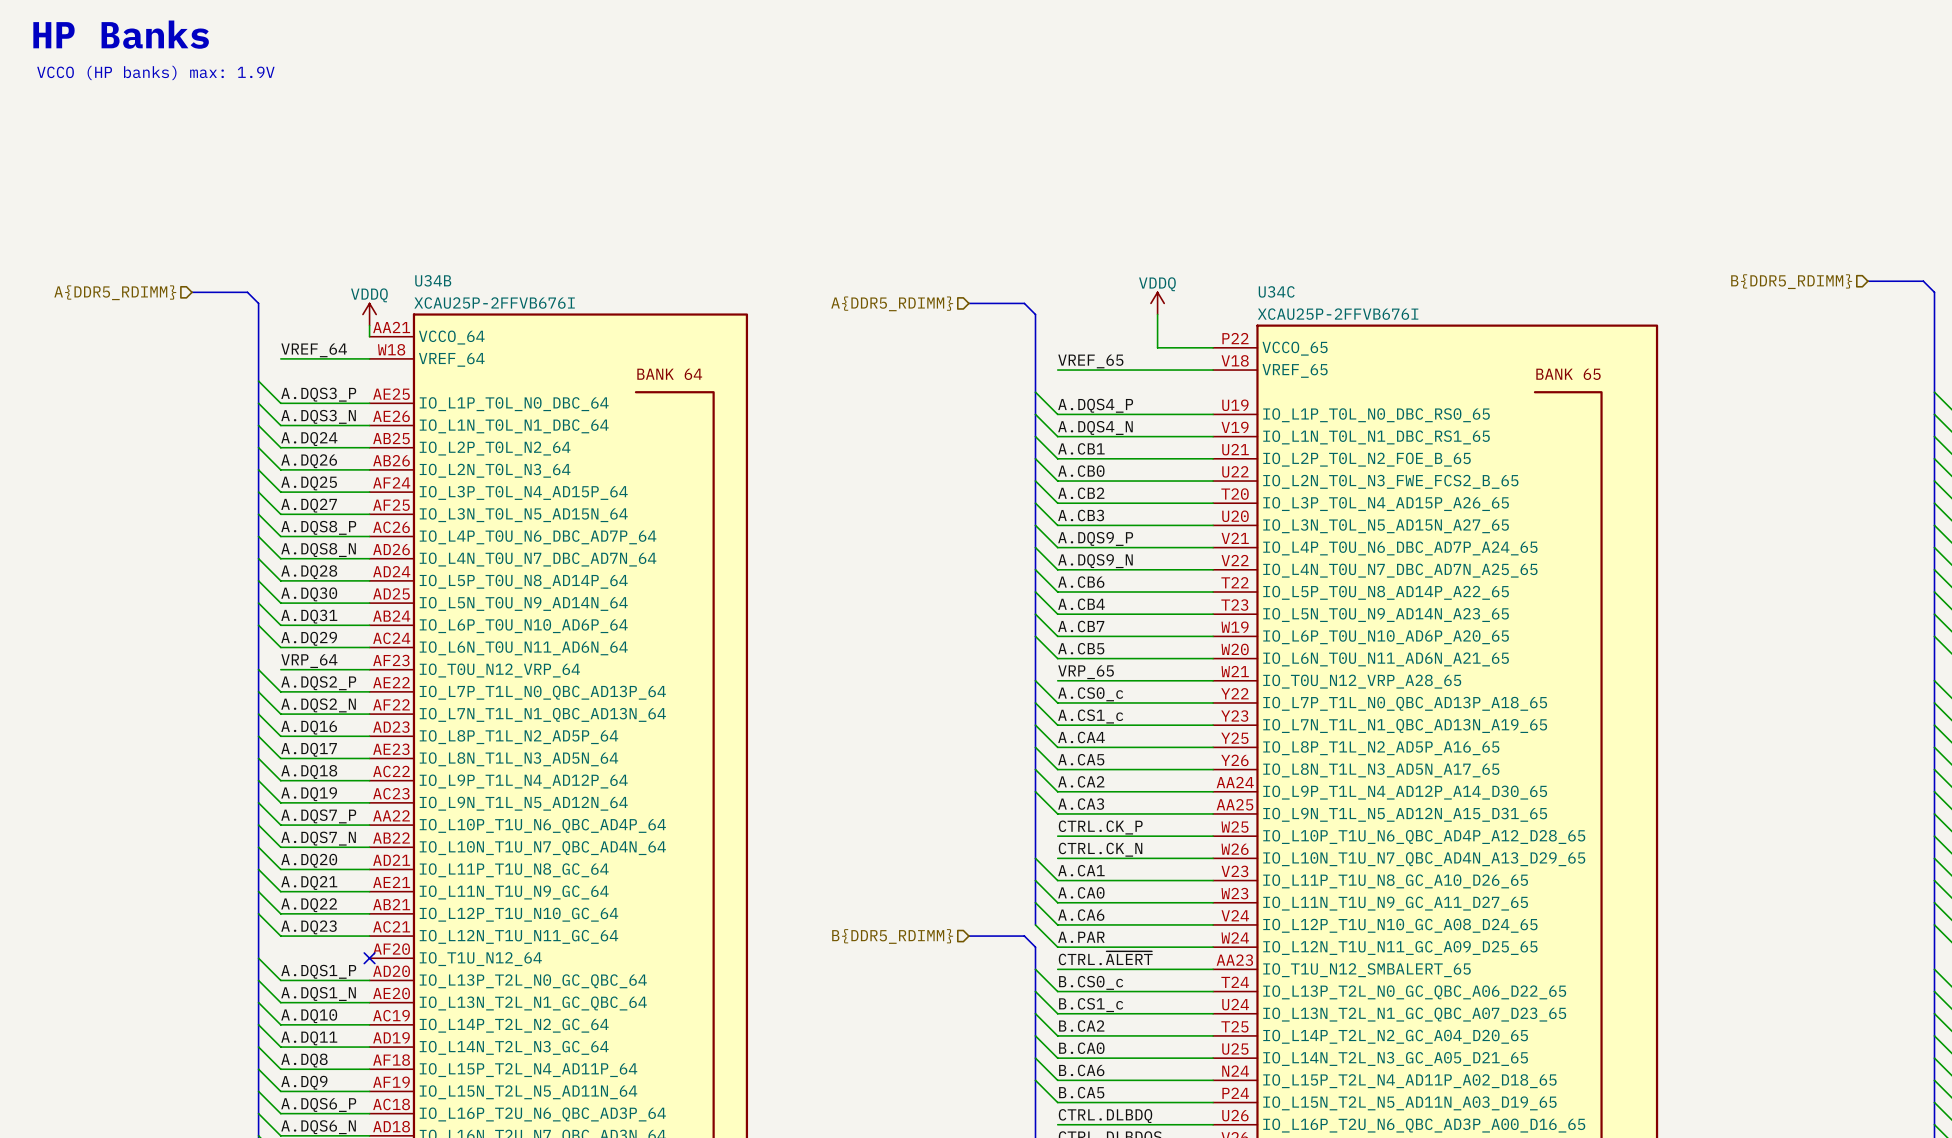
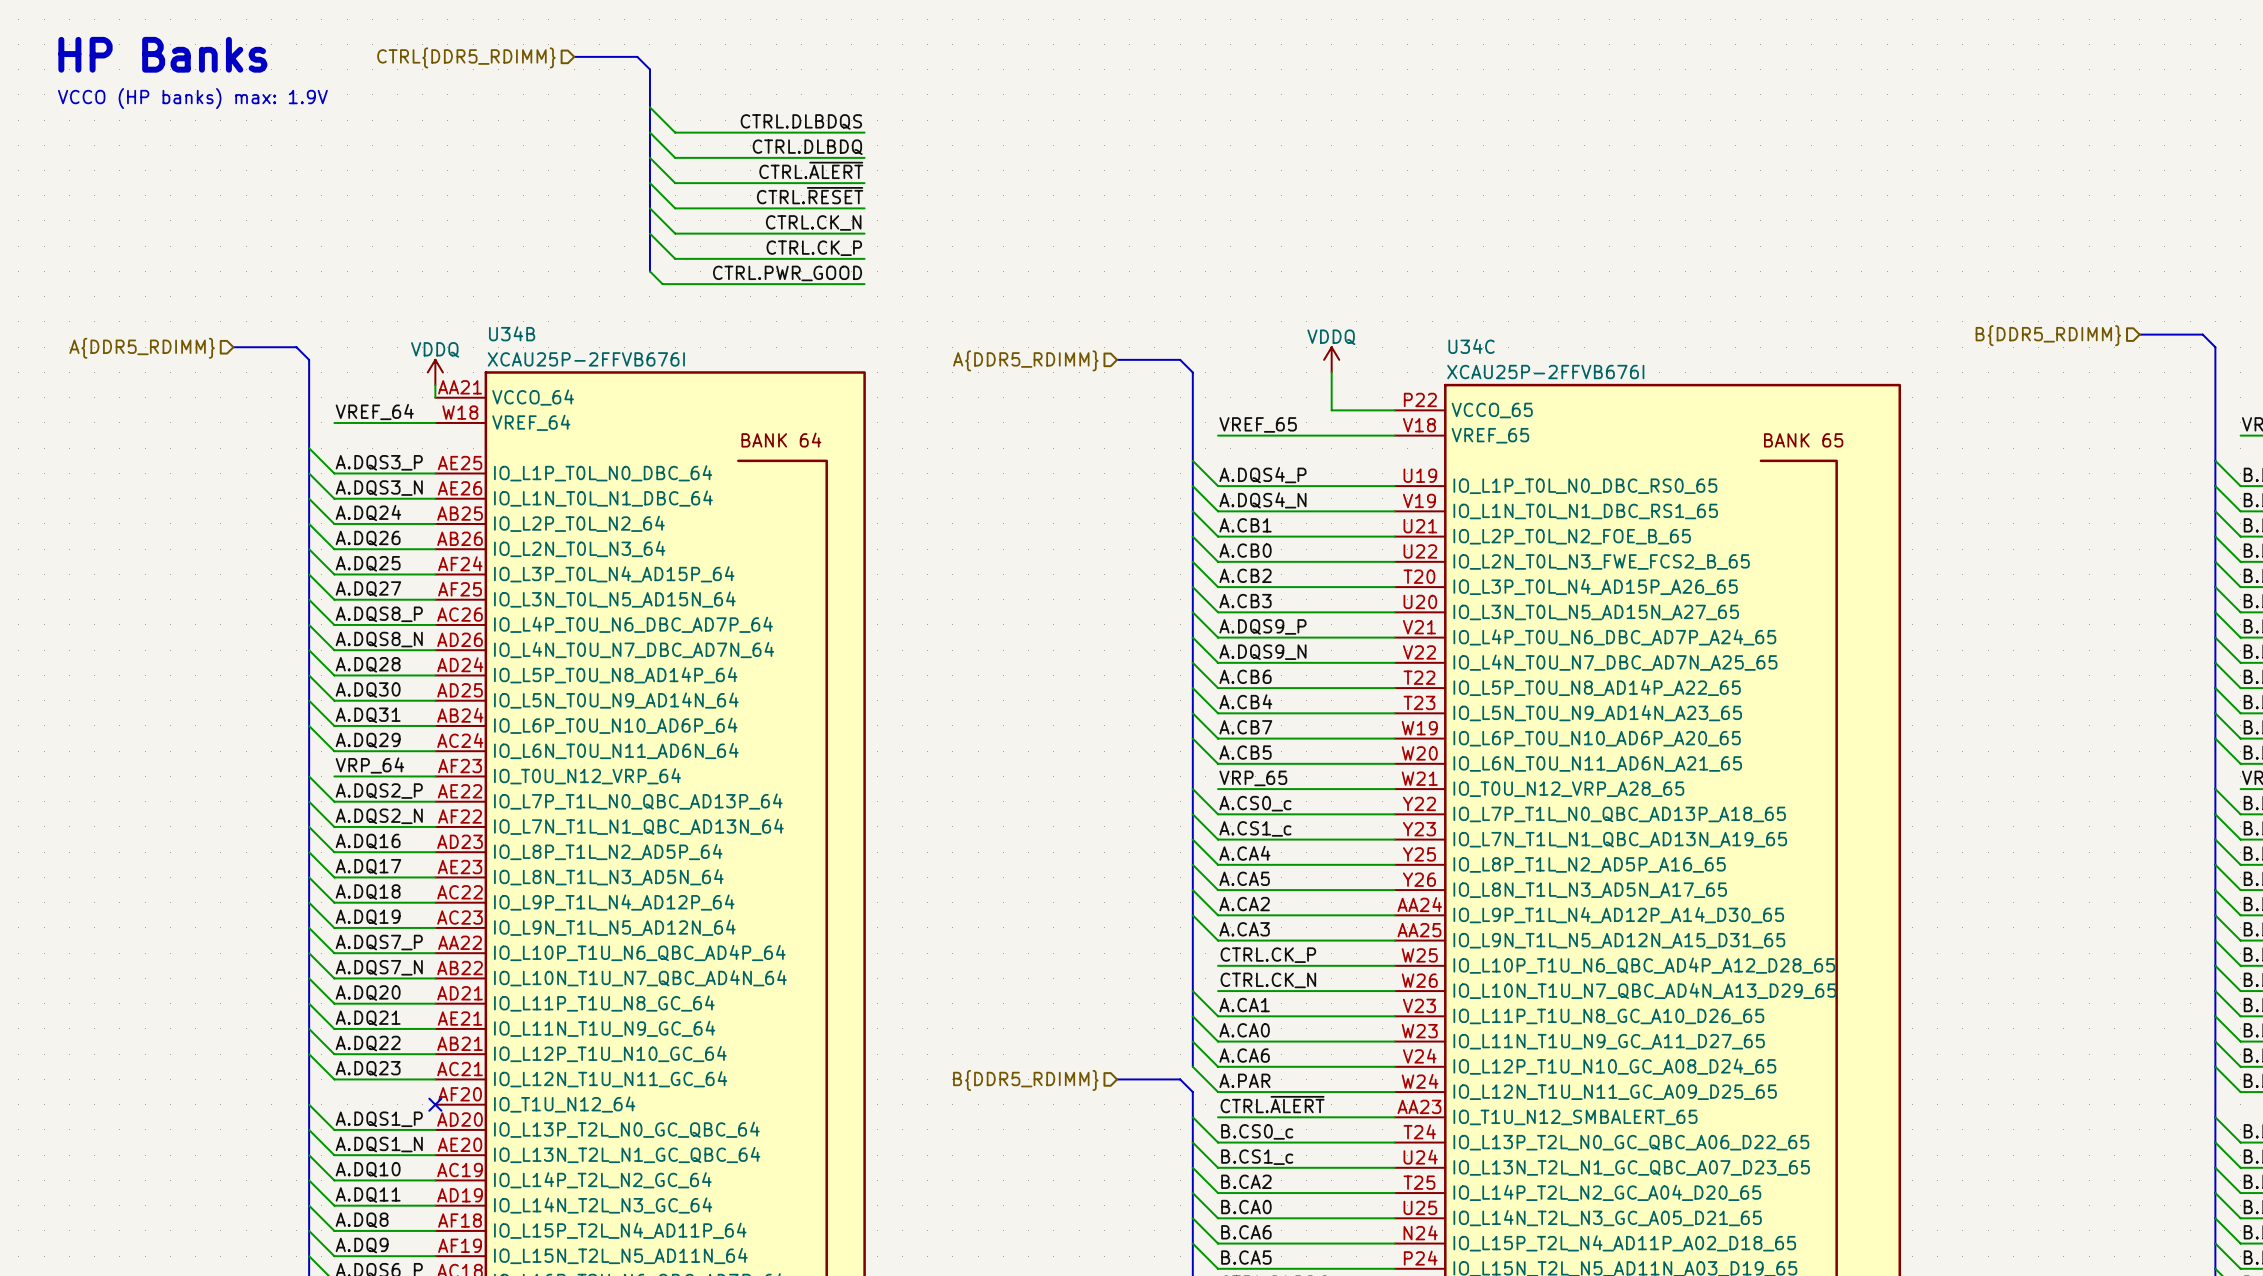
hierarchical label: none -> CTRL{DDR5_RDIMM} (466, 57)
bus: none -> (574, 56) (637, 56) (649, 69) (649, 271)
wire: none -> (649, 107) (675, 132) (864, 132)
label: none -> CTRL.DLBDQS (801, 121)
wire: none -> (649, 132) (675, 157) (864, 157)
label: none -> CTRL.DLBDQ (807, 147)
wire: none -> (649, 157) (675, 183) (864, 183)
label: none -> CTRL.~{ALERT} (811, 170)
wire: none -> (649, 183) (675, 208) (864, 208)
label: none -> CTRL.~{RESET} (810, 195)
wire: none -> (649, 208) (675, 233) (864, 233)
label: none -> CTRL.CK_N (813, 222)
wire: none -> (649, 233) (675, 258) (864, 258)
label: none -> CTRL.CK_P (814, 248)
wire: none -> (649, 271) (662, 284) (864, 284)
label: none -> CTRL.PWR_GOOD (787, 273)

